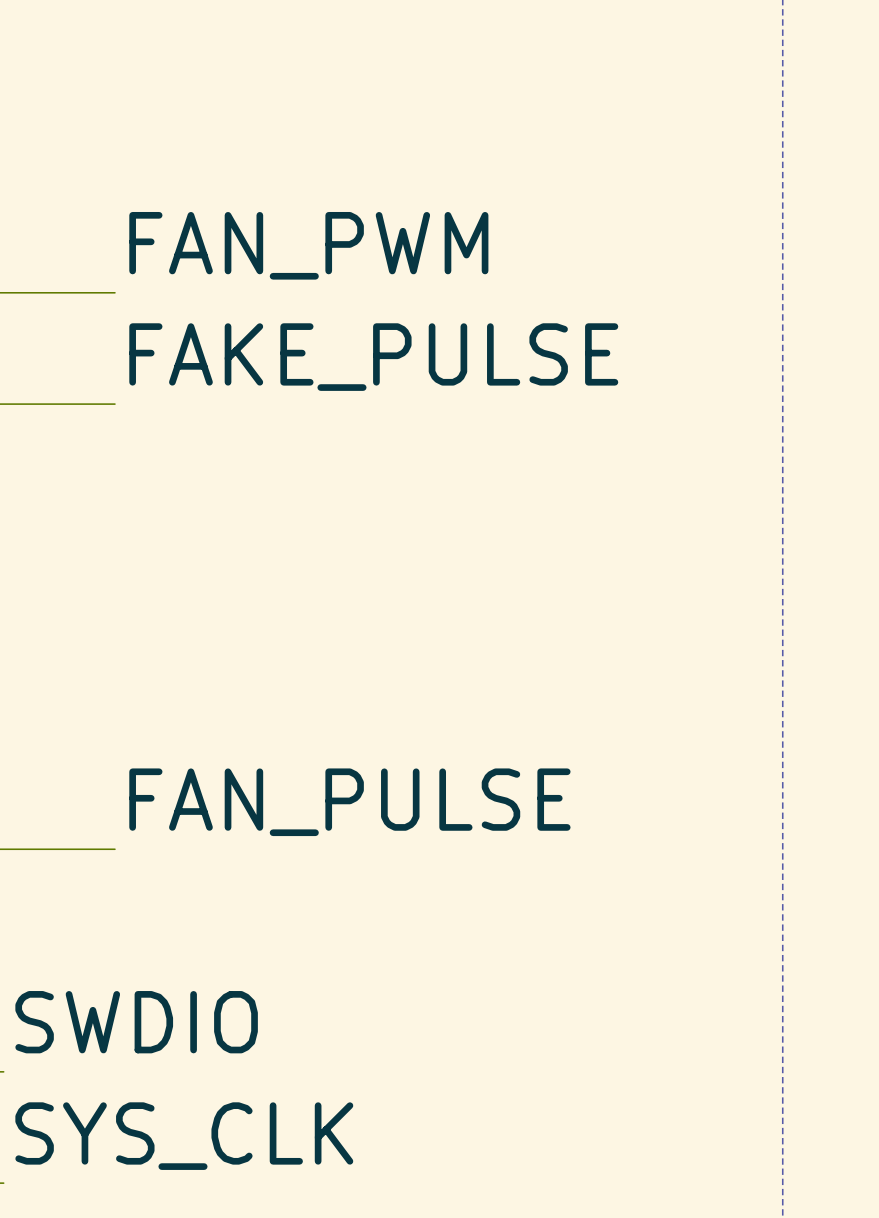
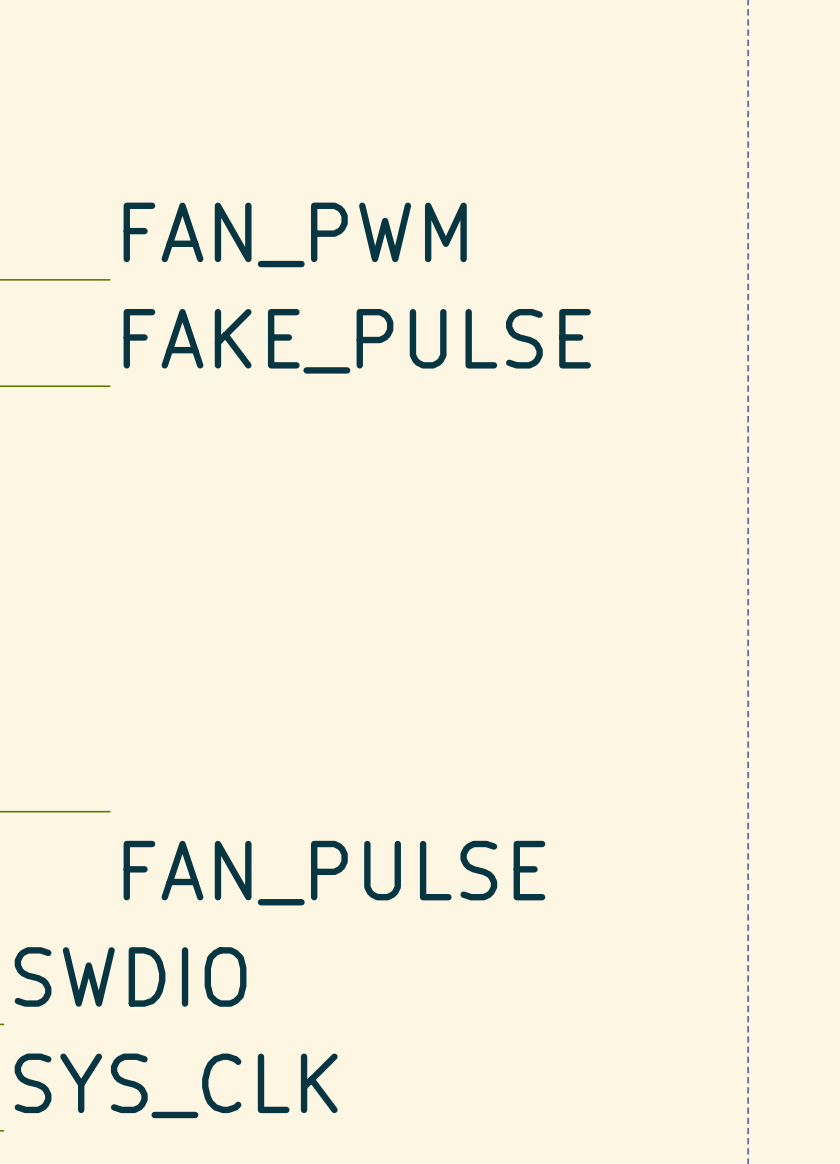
label position: FAN_PULSE (349, 802) -> FAN_PULSE (334, 873)

